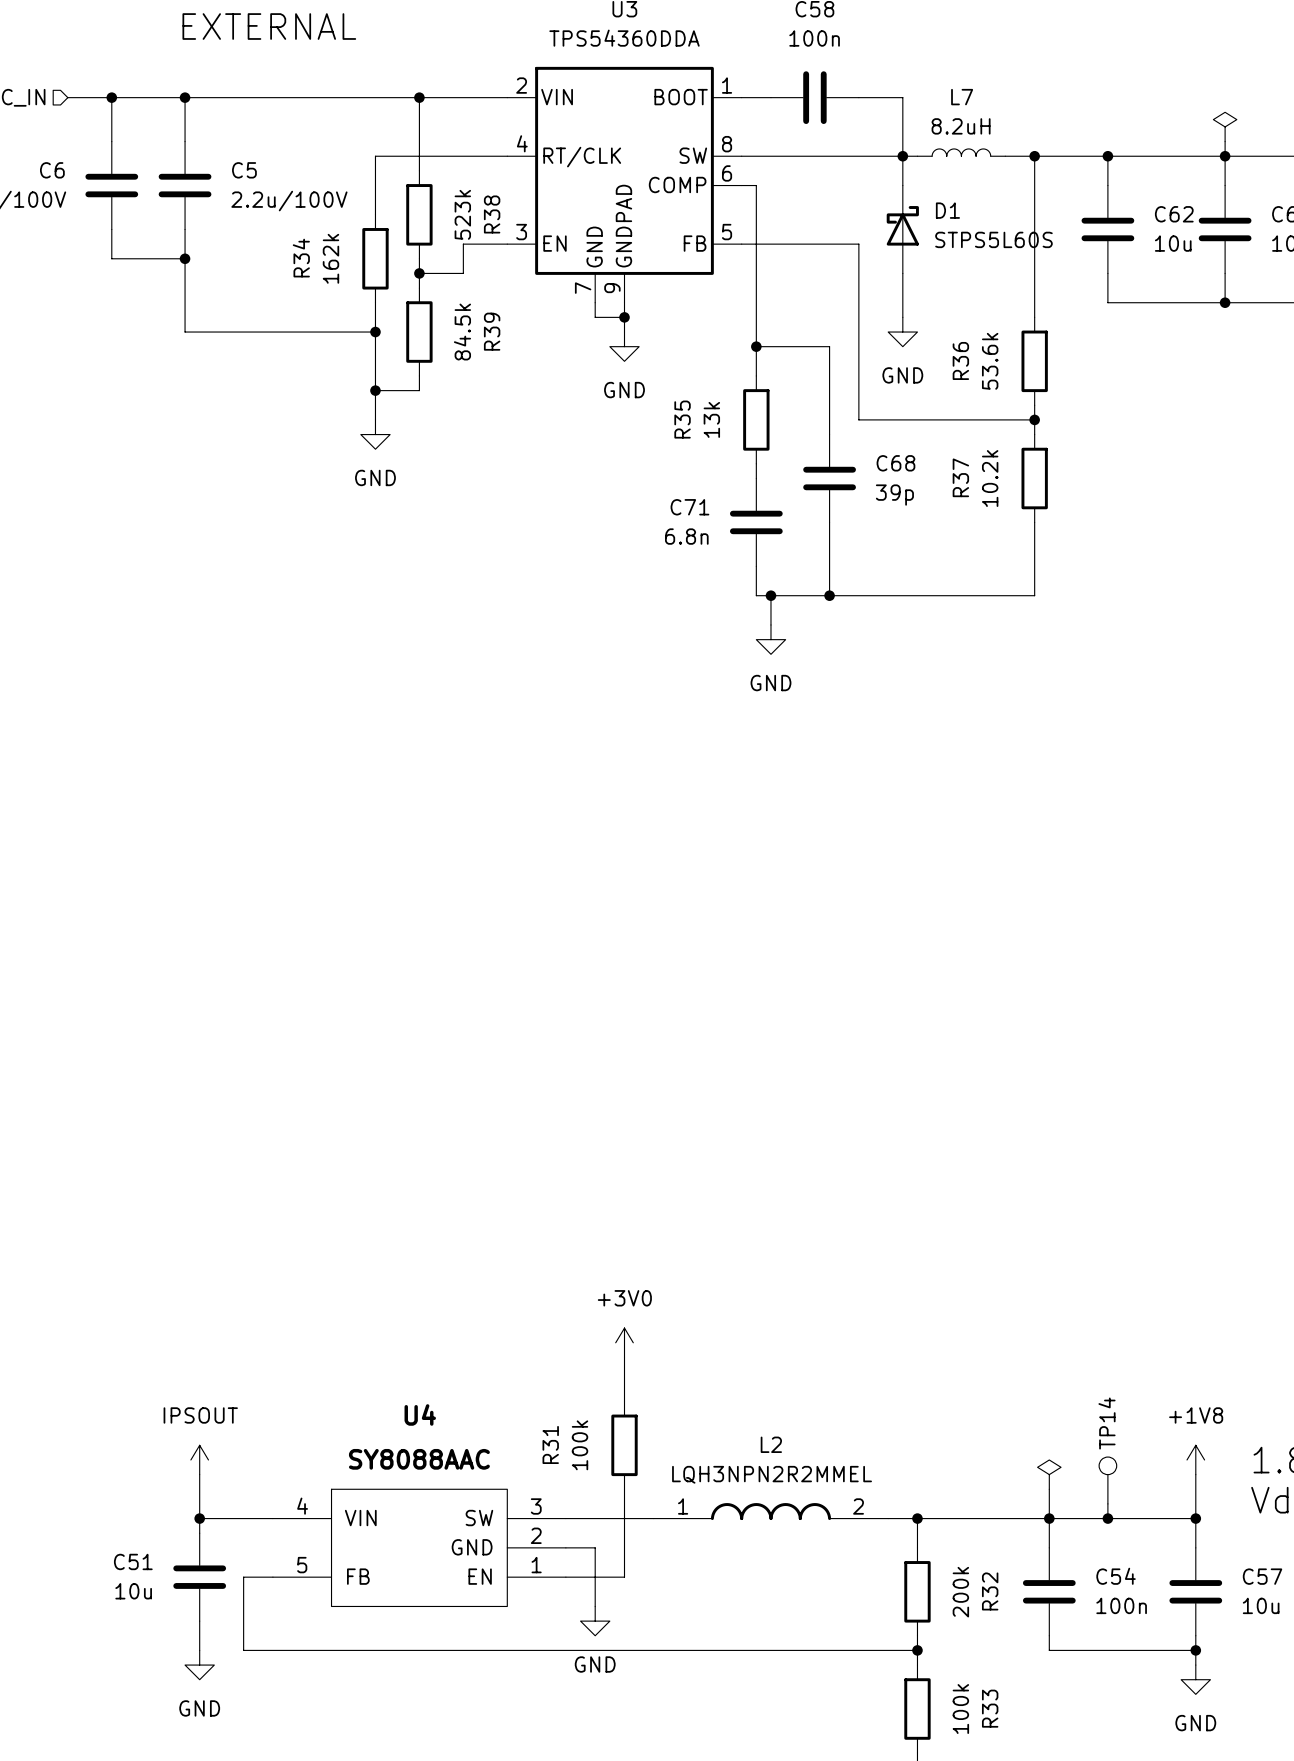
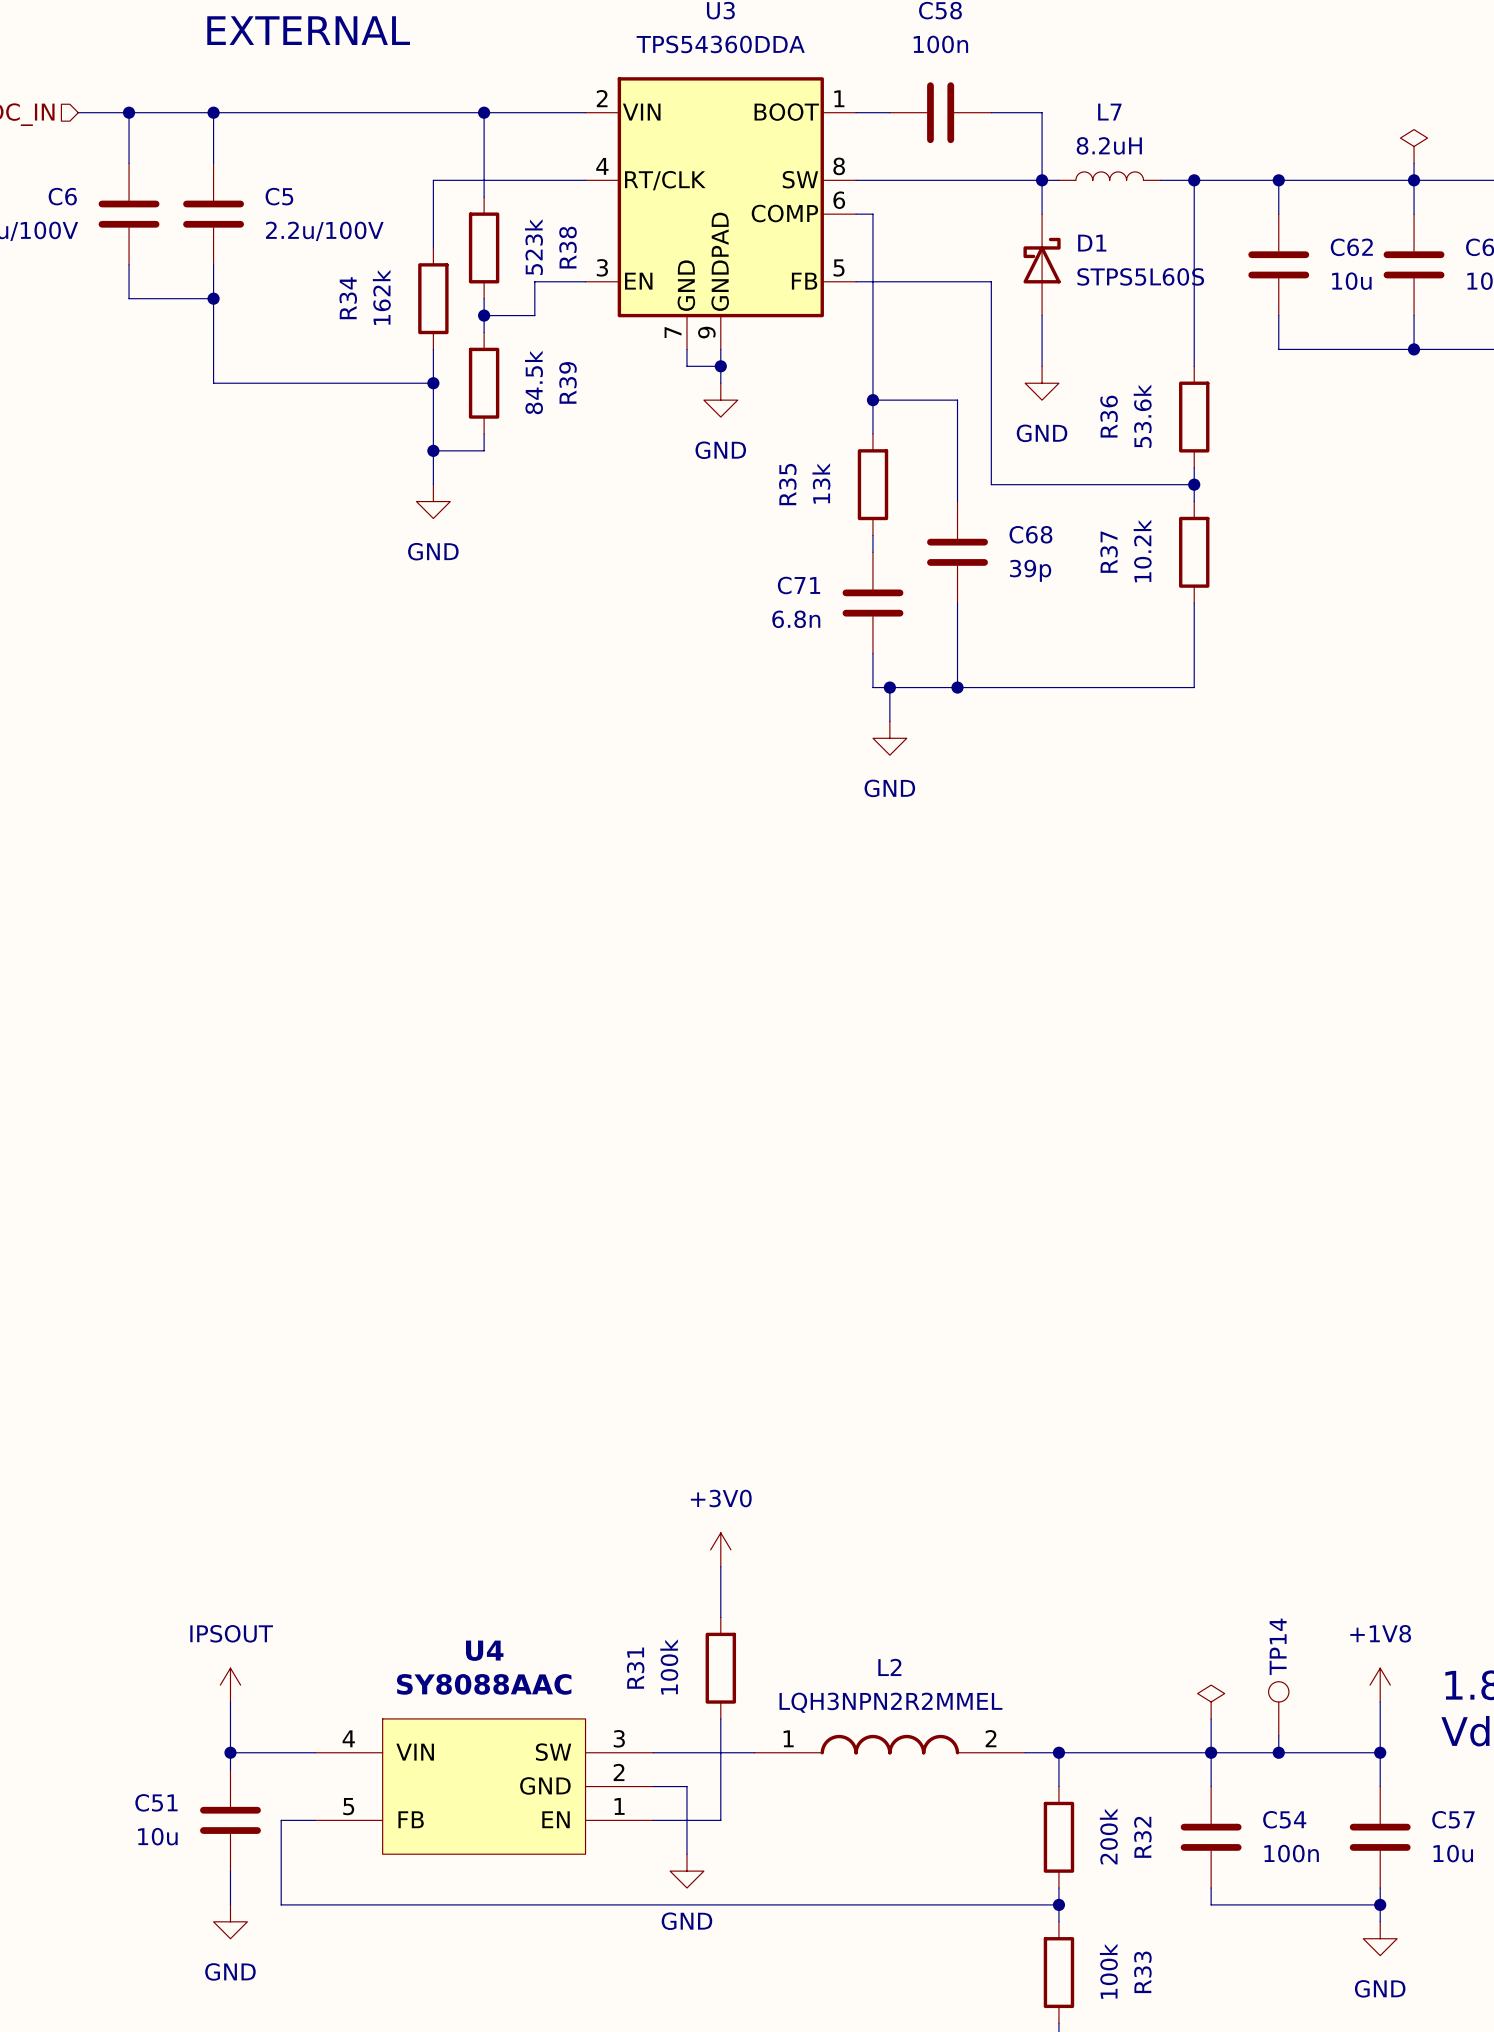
U4 name position: U4 (420, 1414) -> U4 (484, 1650)

